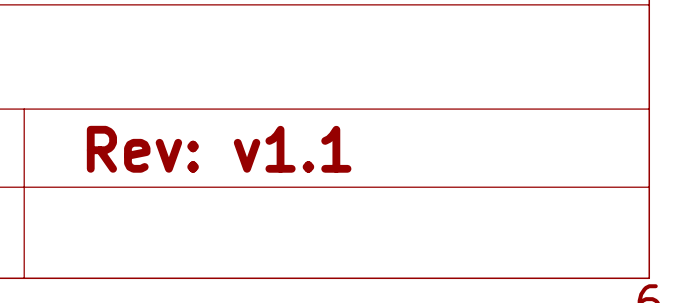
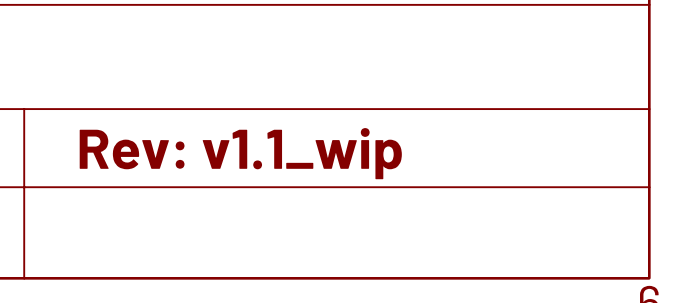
title block: Rev: v1.1 (219, 149) -> Rev: v1.1_wip (240, 153)

